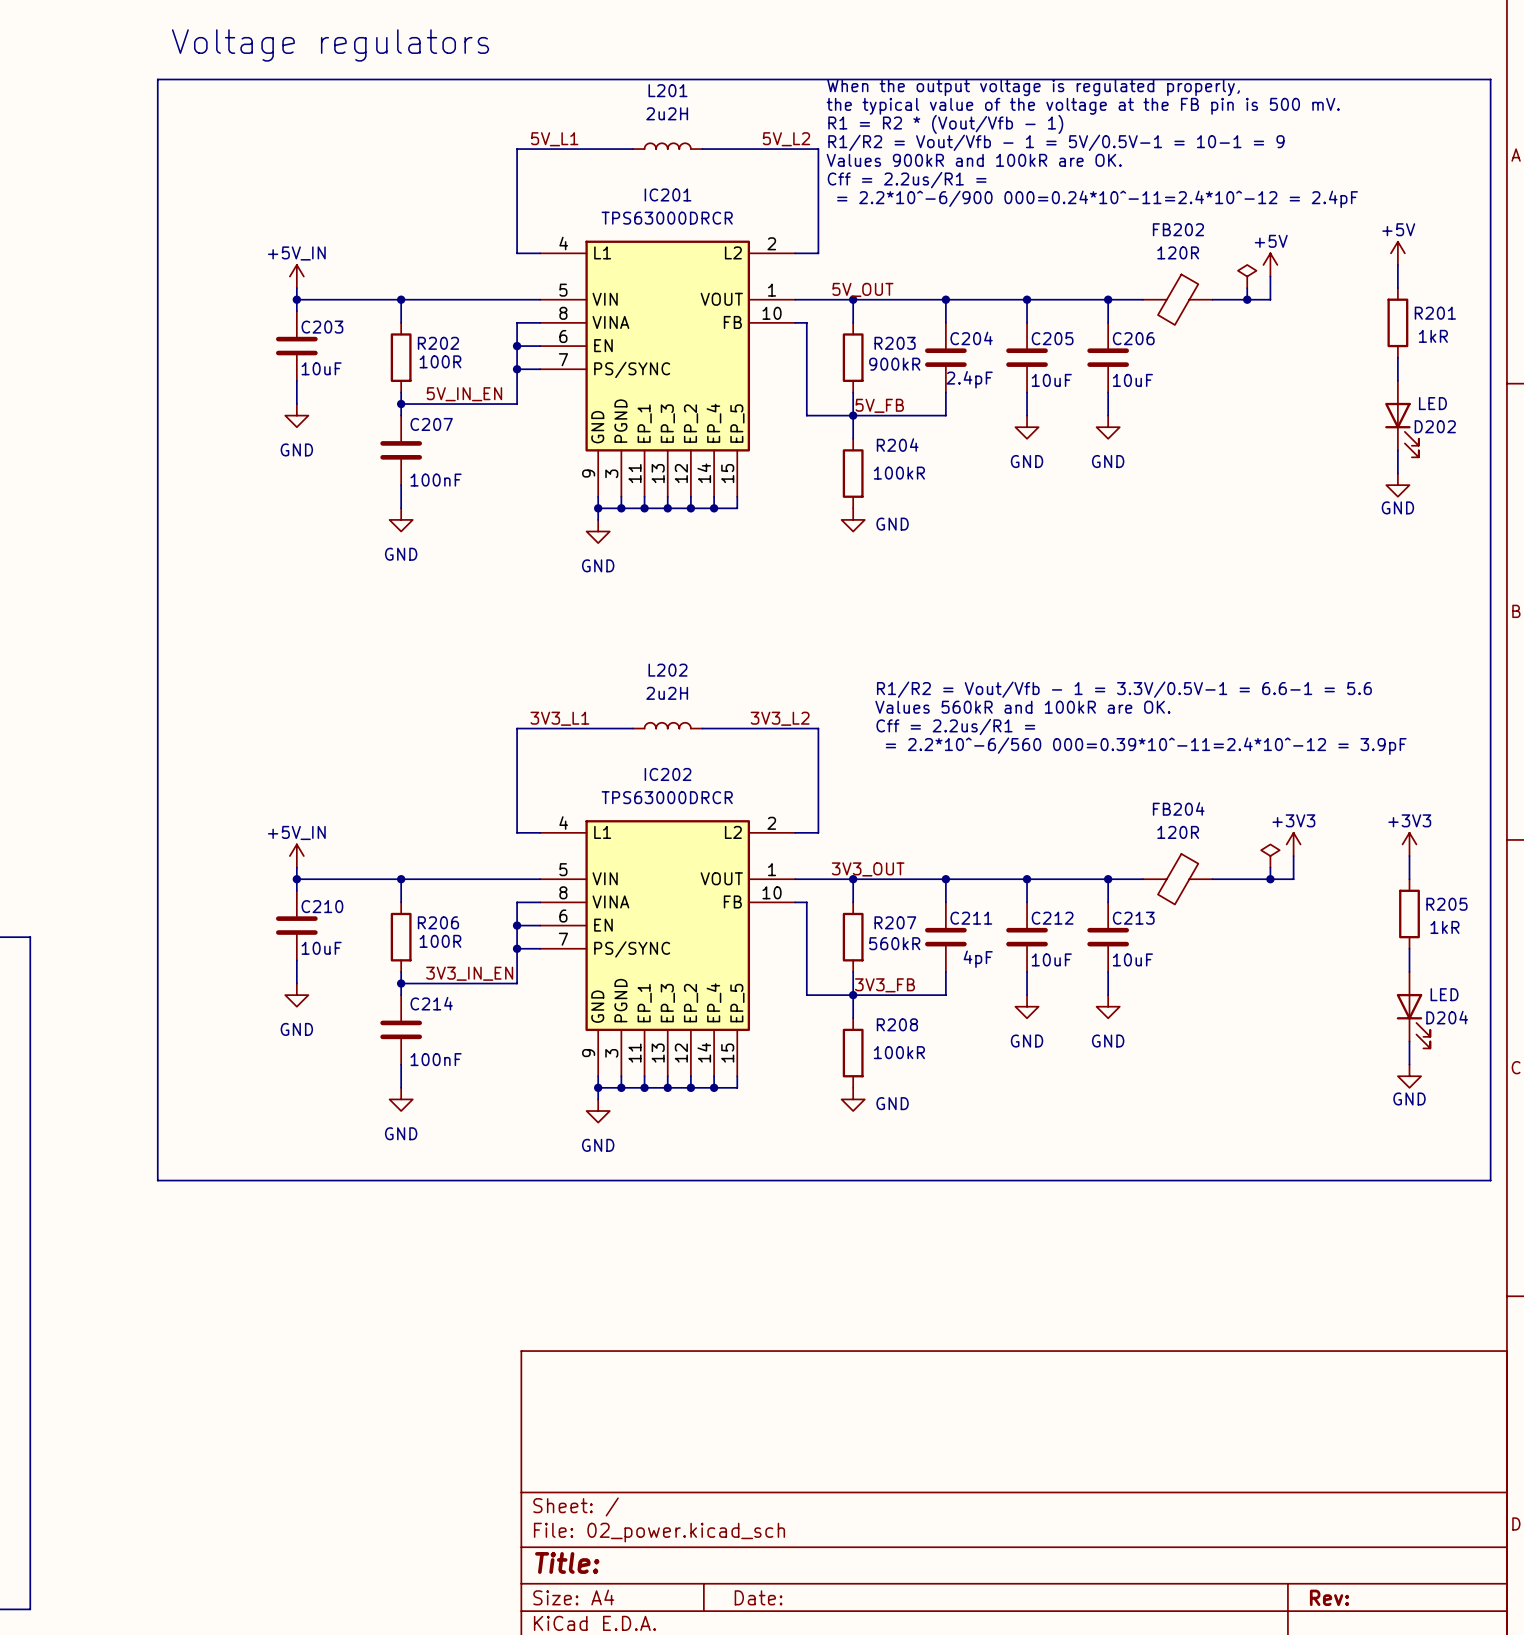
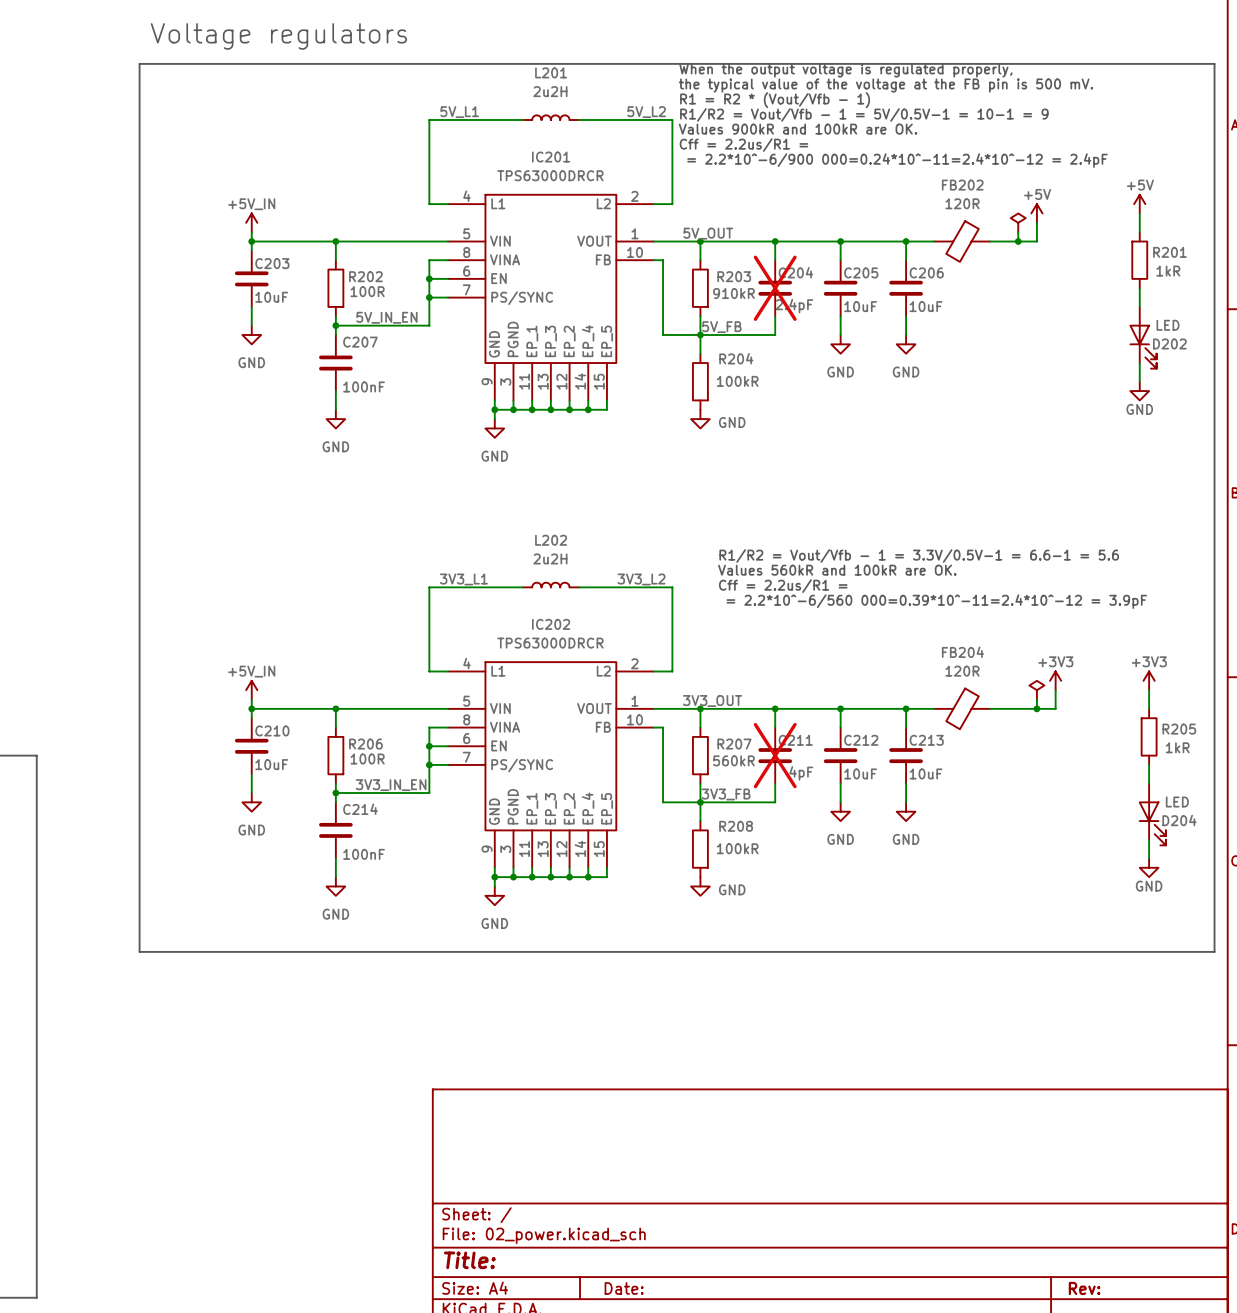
C204 do-not-place cross: none -> (775, 288)
R203 value: 900kR (894, 364) -> 910kR (733, 293)
C211 do-not-place cross: none -> (775, 755)

